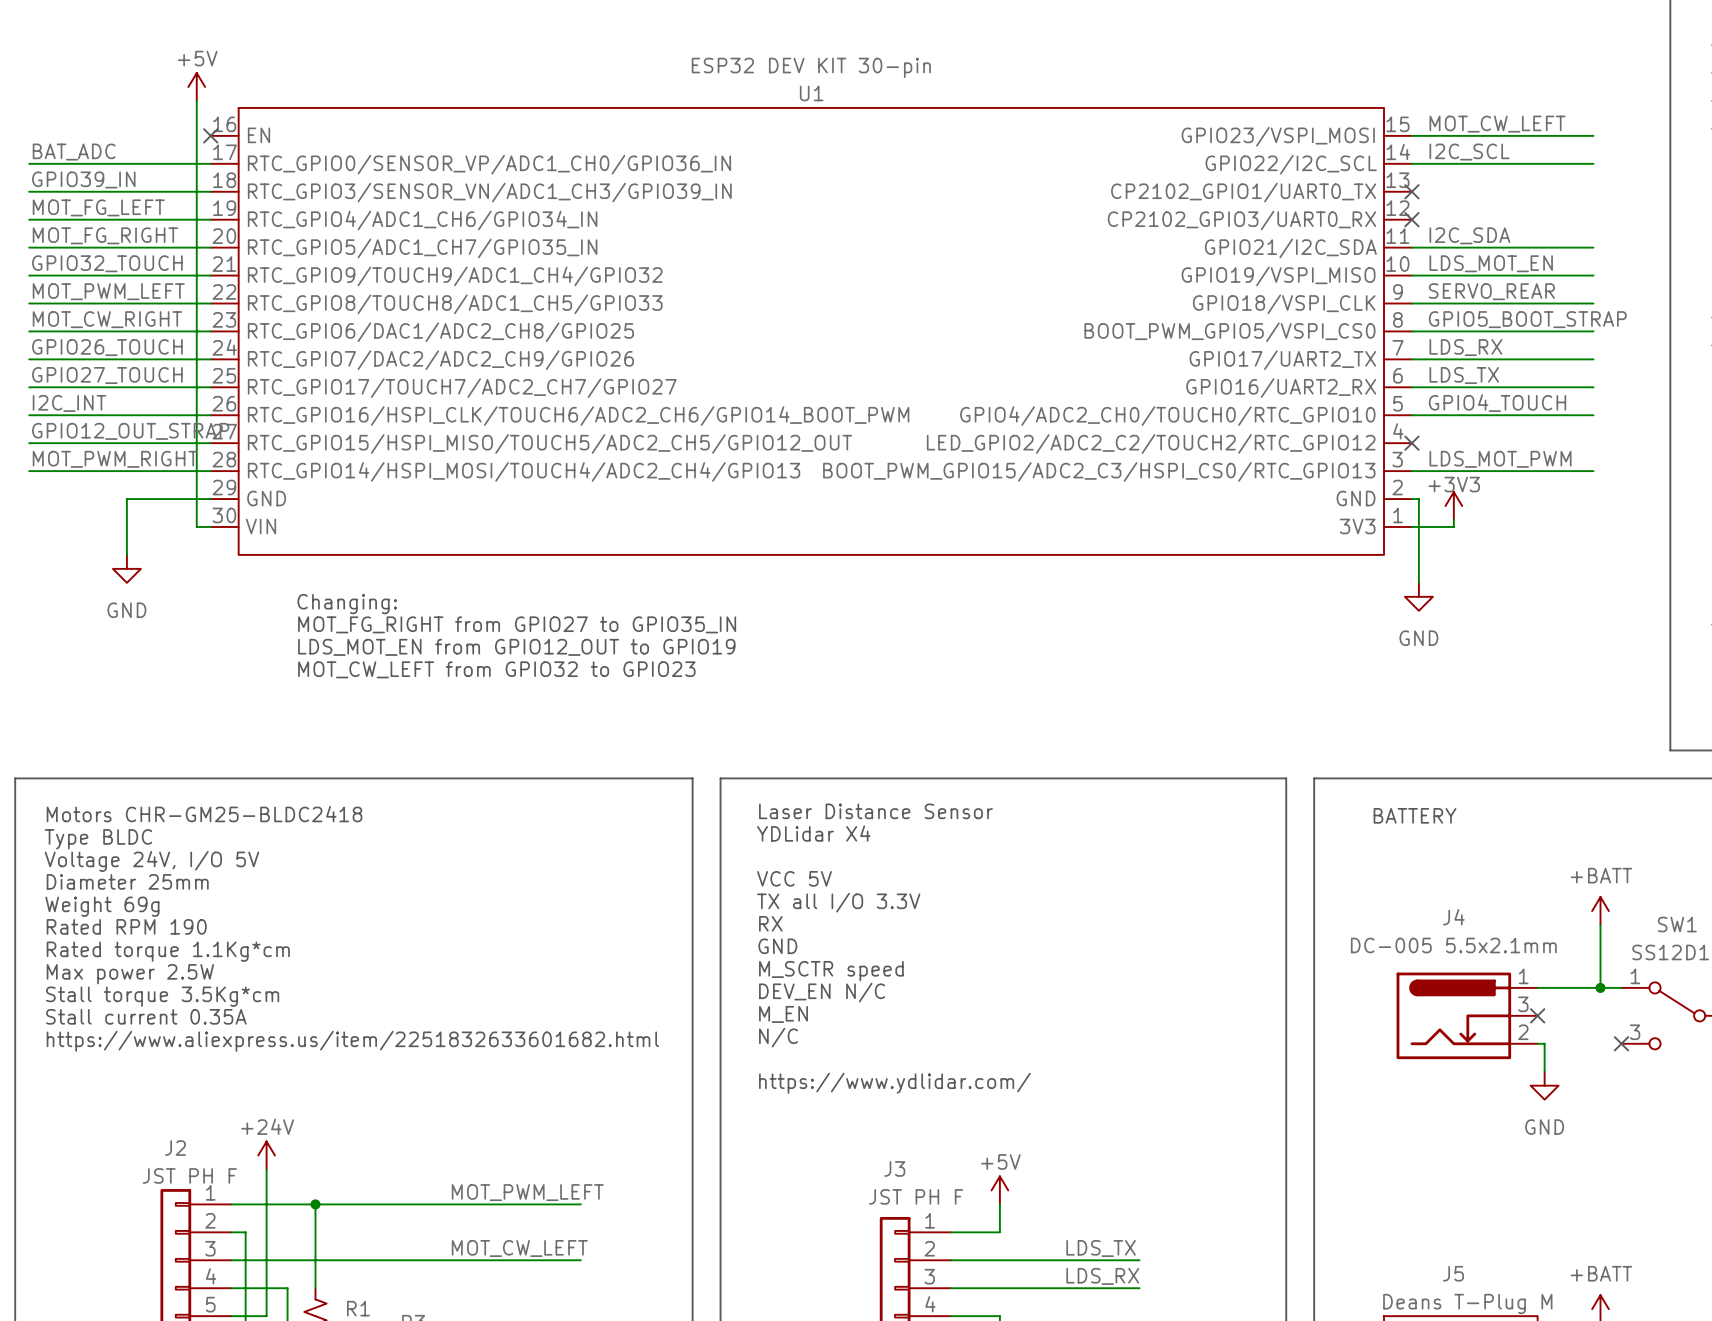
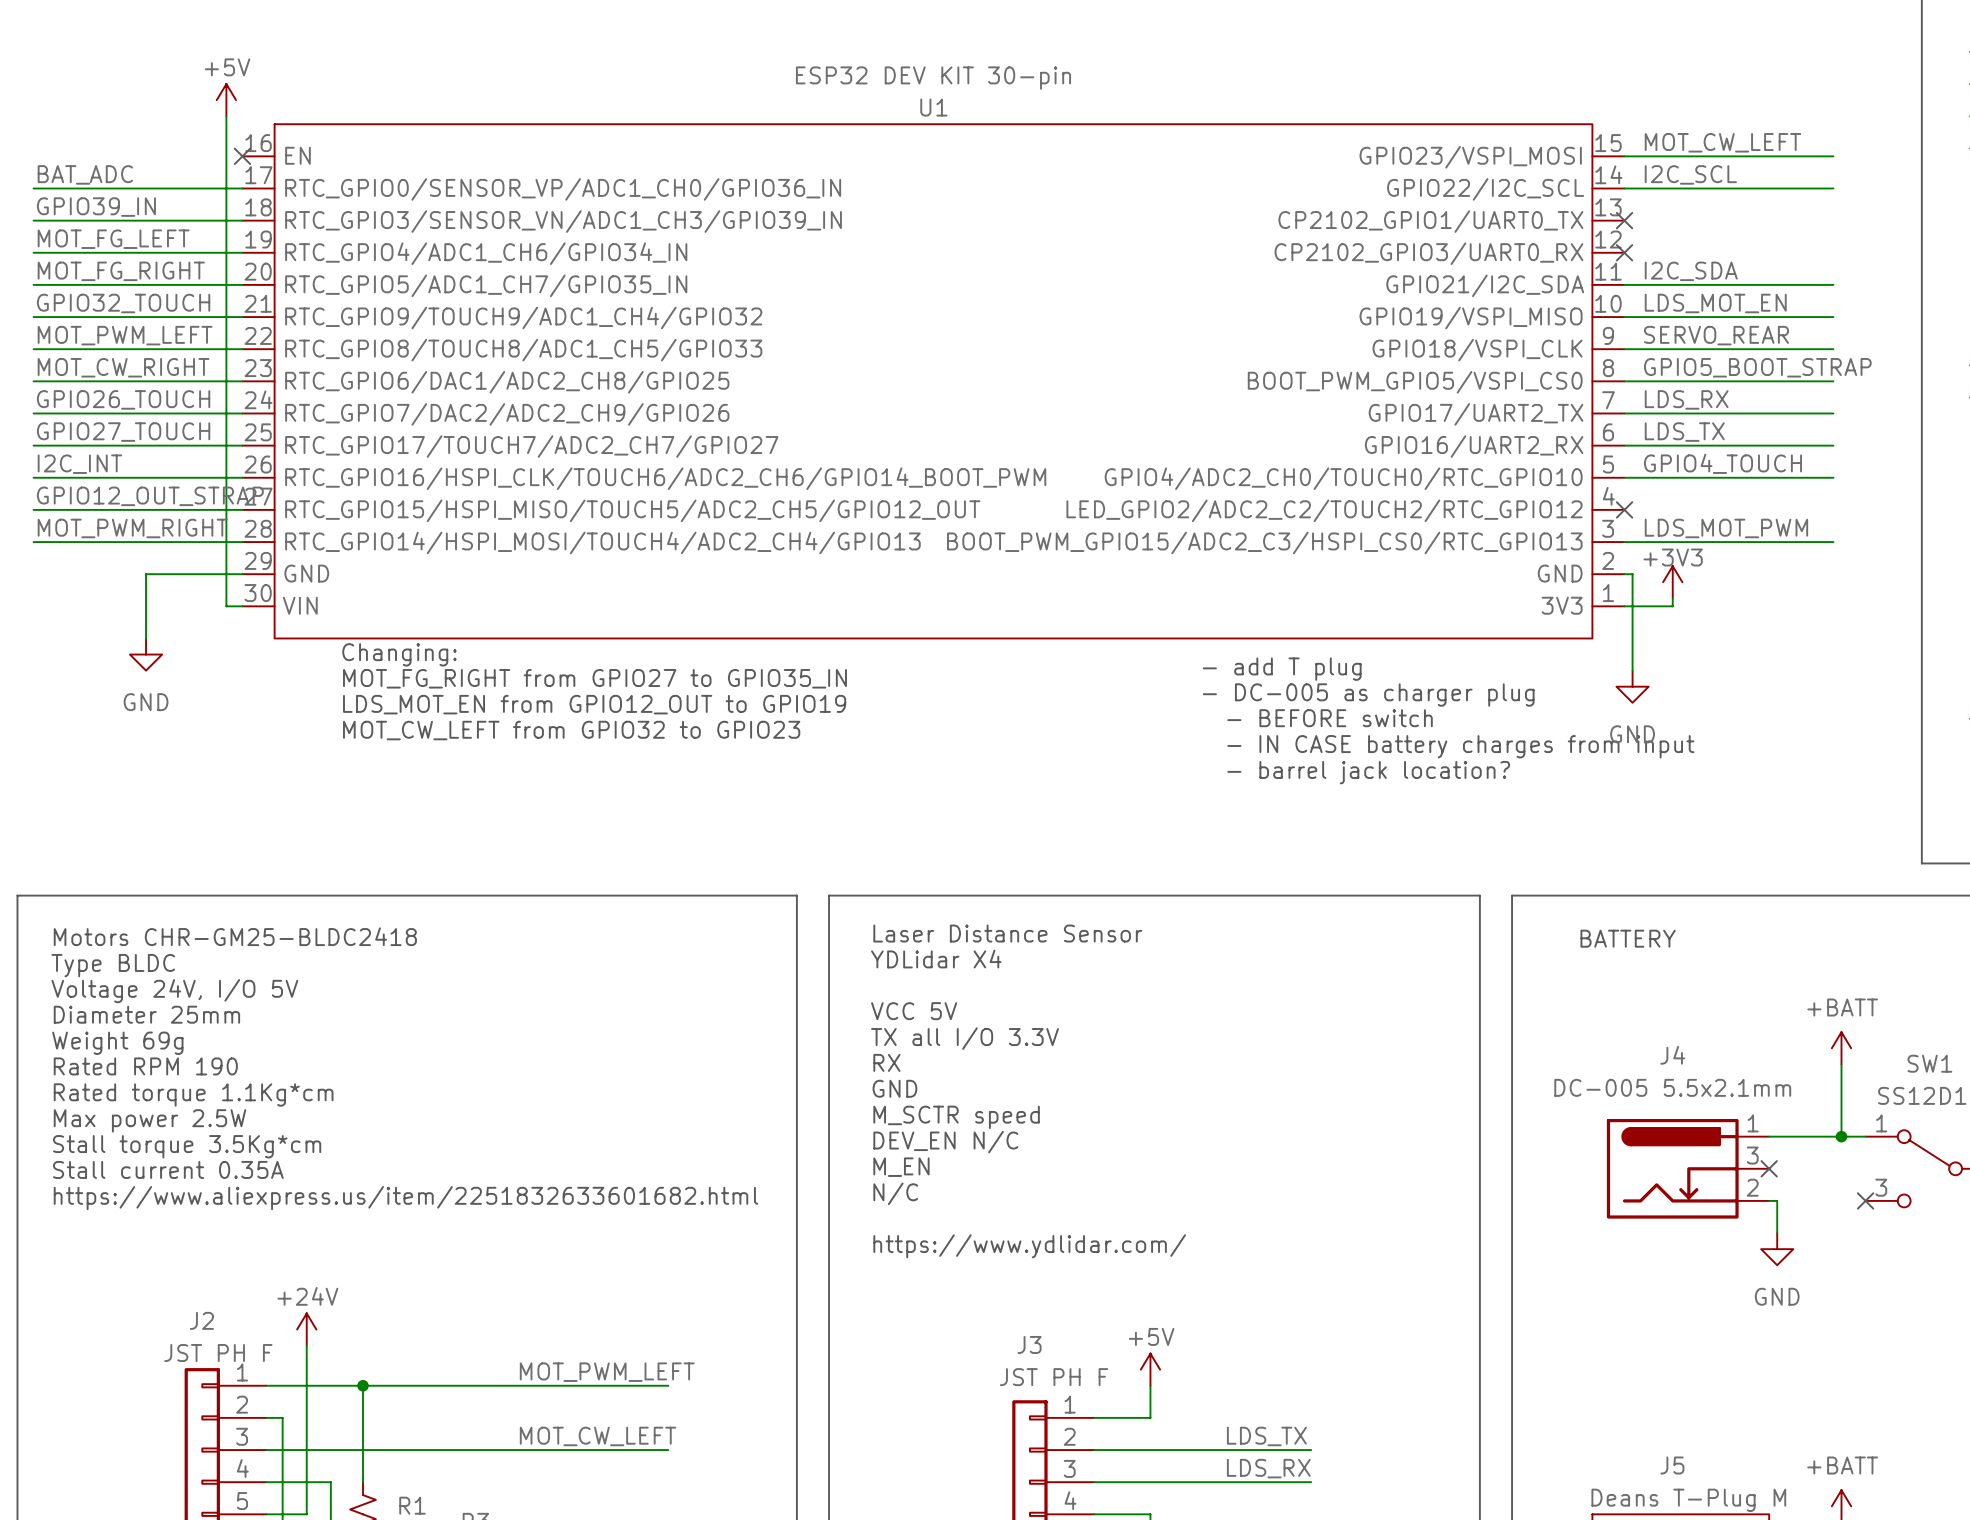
text: none -> - add T plug (1282, 669)
text position: Changing: (347, 604) -> Changing: (399, 654)
text: none -> - DC-005 as charger plug (1368, 695)
text position: MOT_FG_RIGHT from GPIO27 to GPIO35_IN (517, 624) -> MOT_FG_RIGHT from GPIO27 to GPIO35_IN (594, 678)
text: none -> - BEFORE switch (1330, 718)
text position: LDS_MOT_EN from GPIO12_OUT to GPIO19 (516, 647) -> LDS_MOT_EN from GPIO12_OUT to GPIO19 (594, 704)
text: none -> - IN CASE battery charges from input (1460, 746)
text position: MOT_CW_LEFT from GPIO32 to GPIO23 (496, 669) -> MOT_CW_LEFT from GPIO32 to GPIO23 (571, 730)
text: none -> - barrel jack location? (1368, 772)

